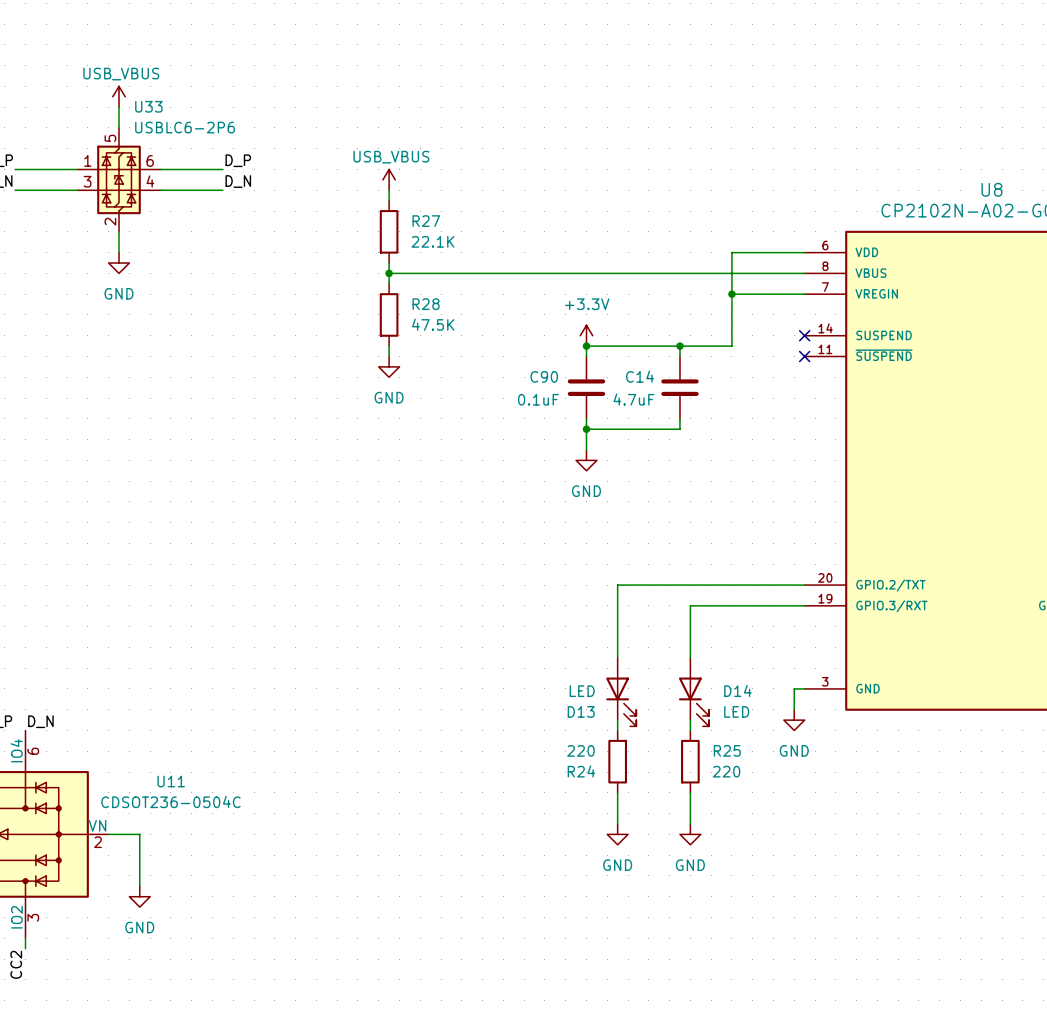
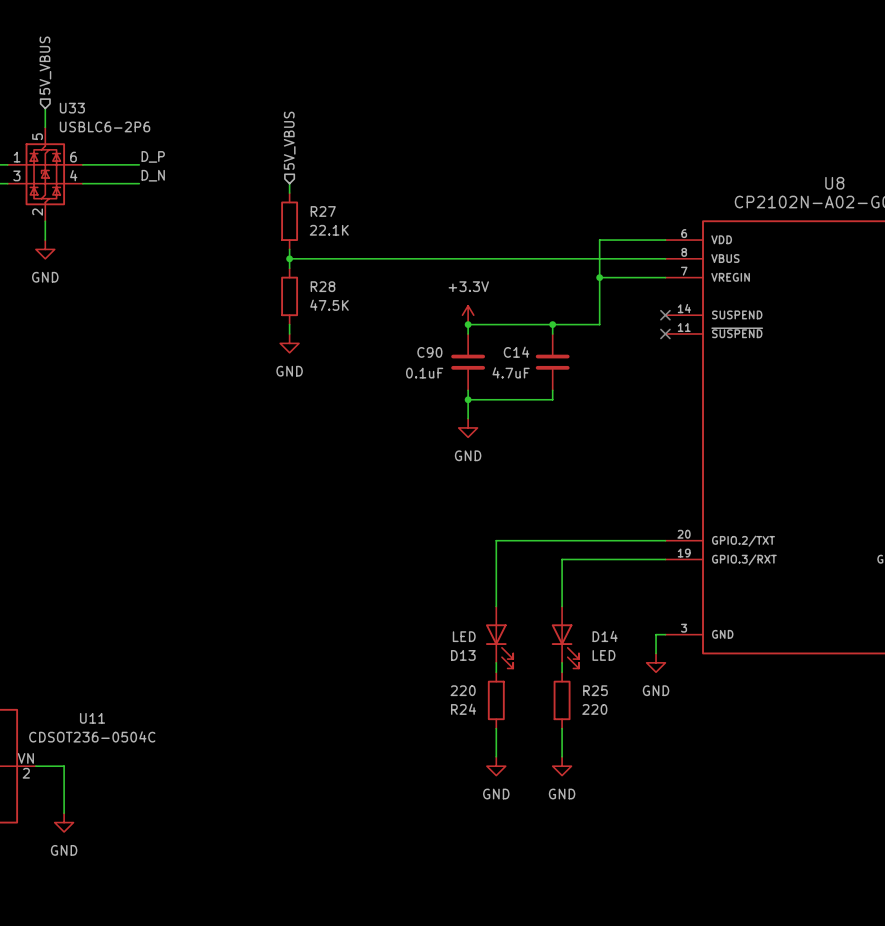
hierarchical label: none -> 5V_VBUS (45, 65)
power symbol: USB_VBUS (118, 96) -> none
hierarchical label: none -> 5V_VBUS (289, 140)
power symbol: USB_VBUS (389, 179) -> none

